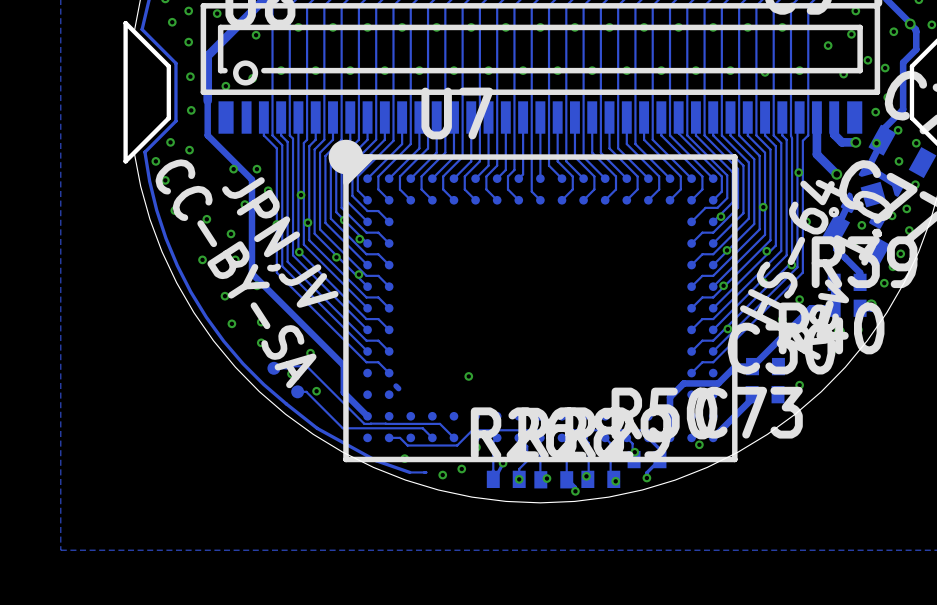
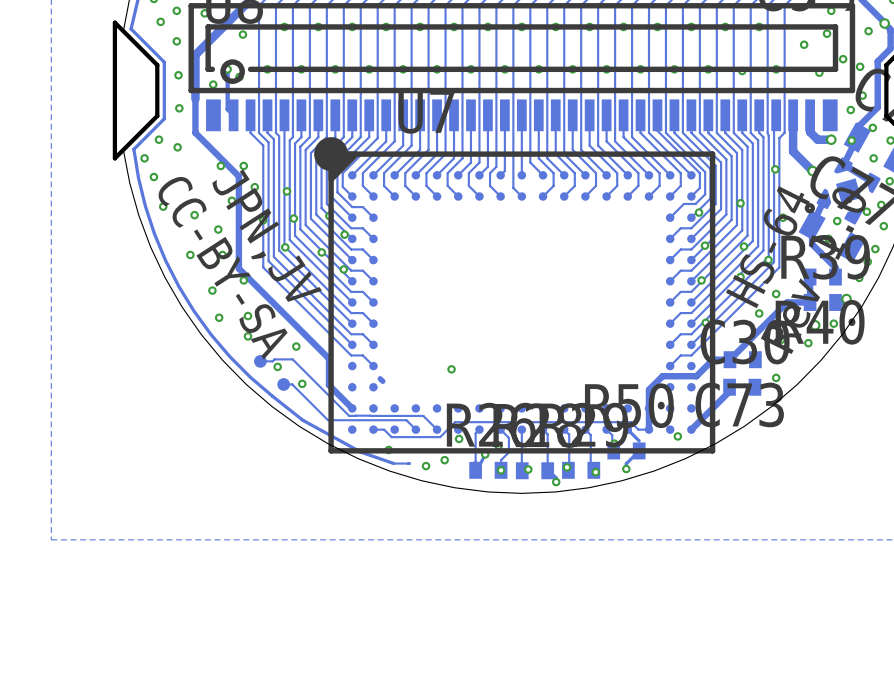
track: none -> (227, 69) (227, 109) (233, 115)
via: none -> (227, 69)

